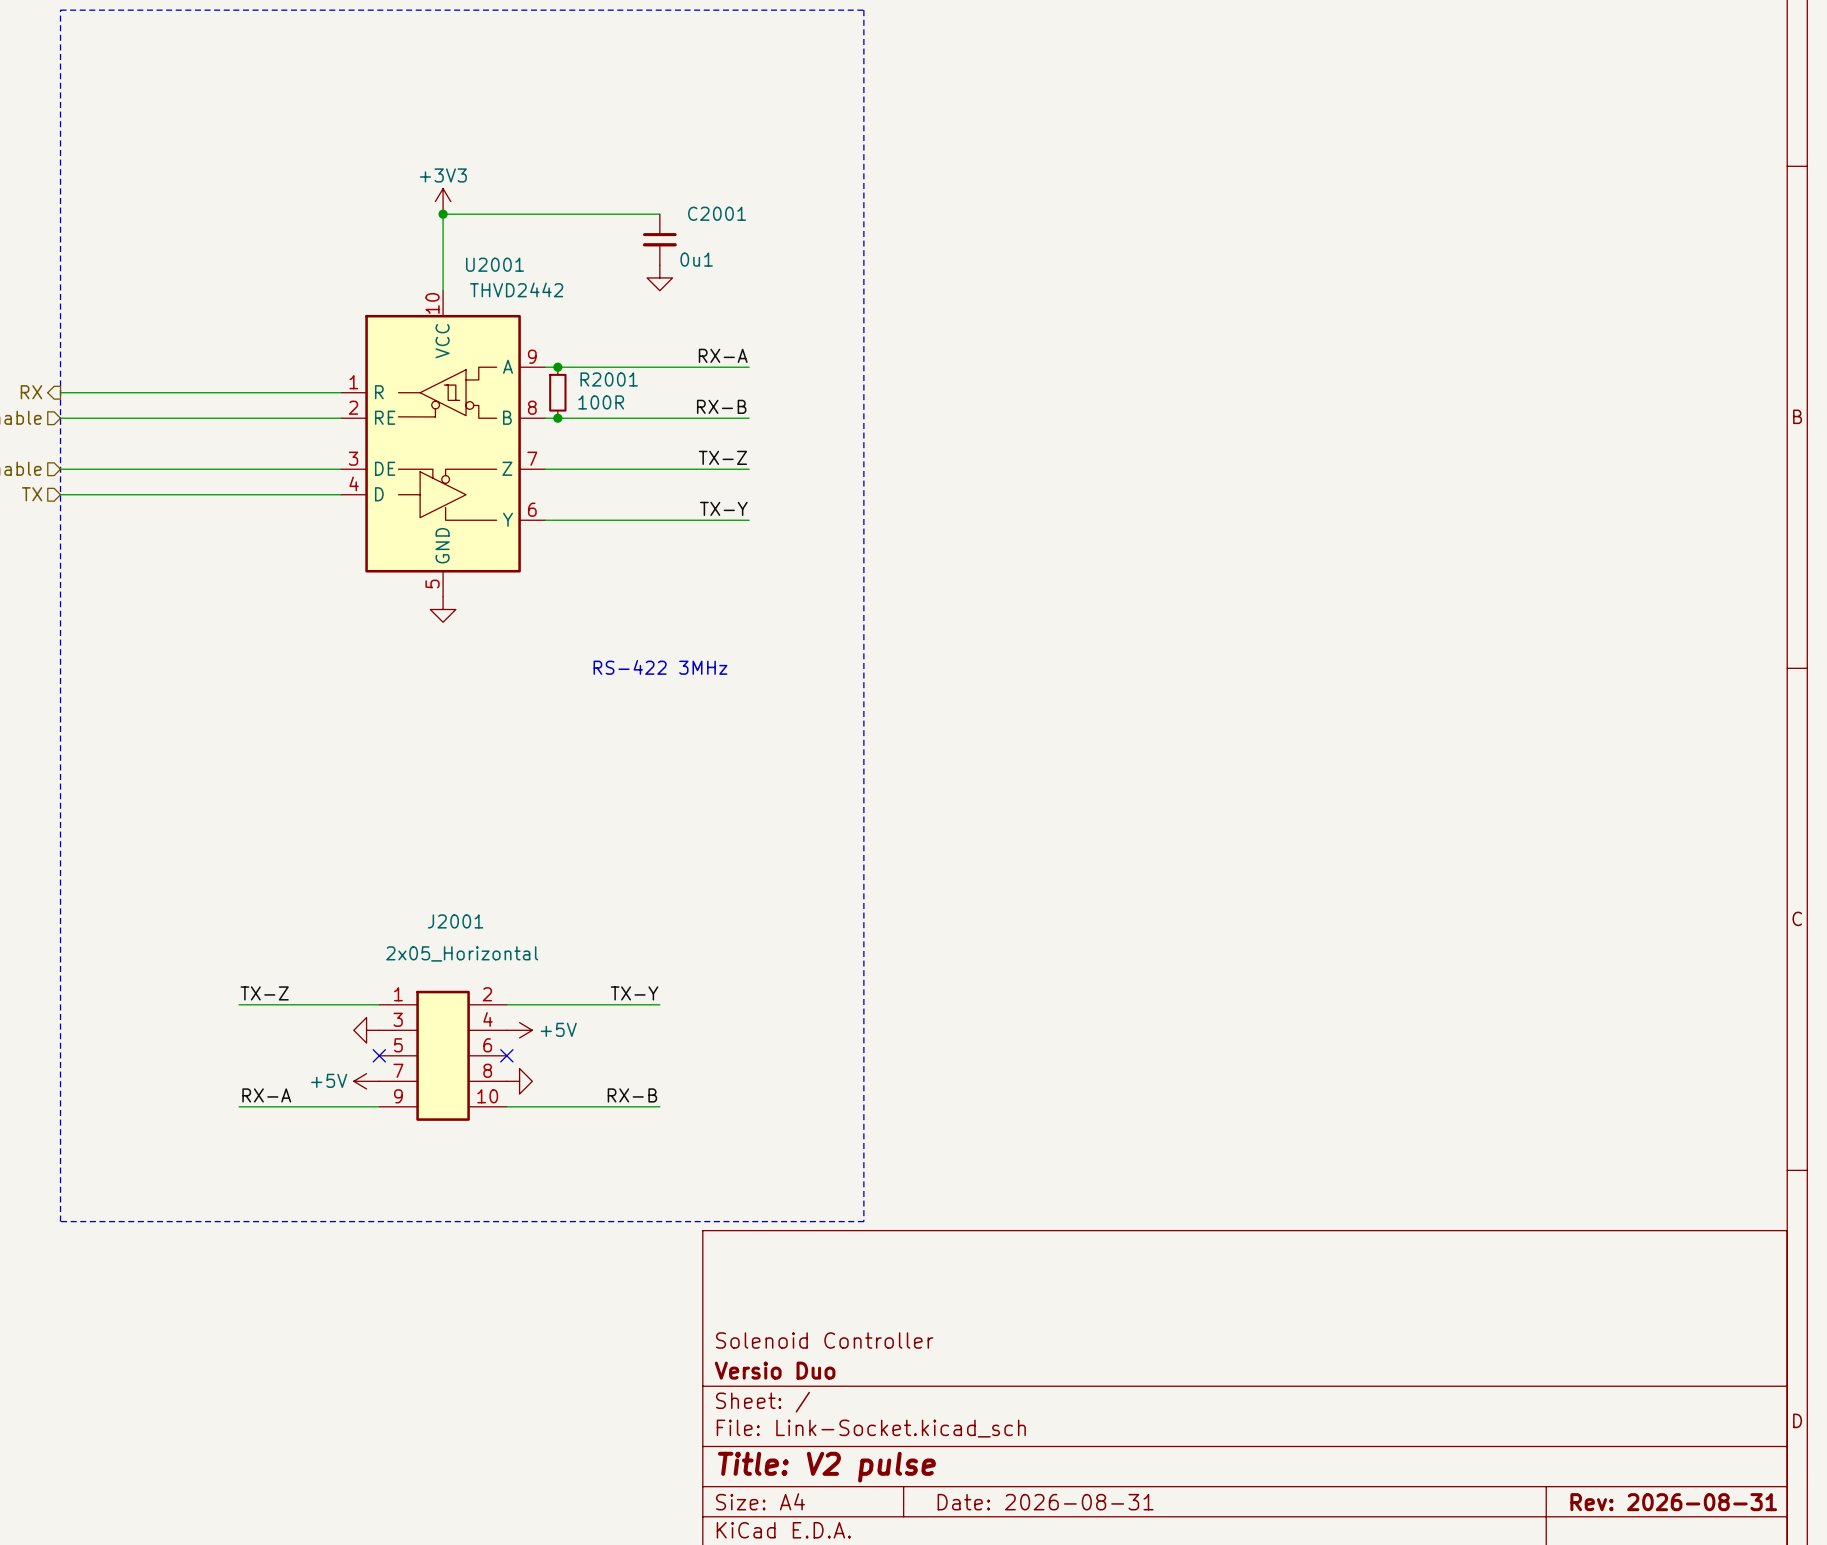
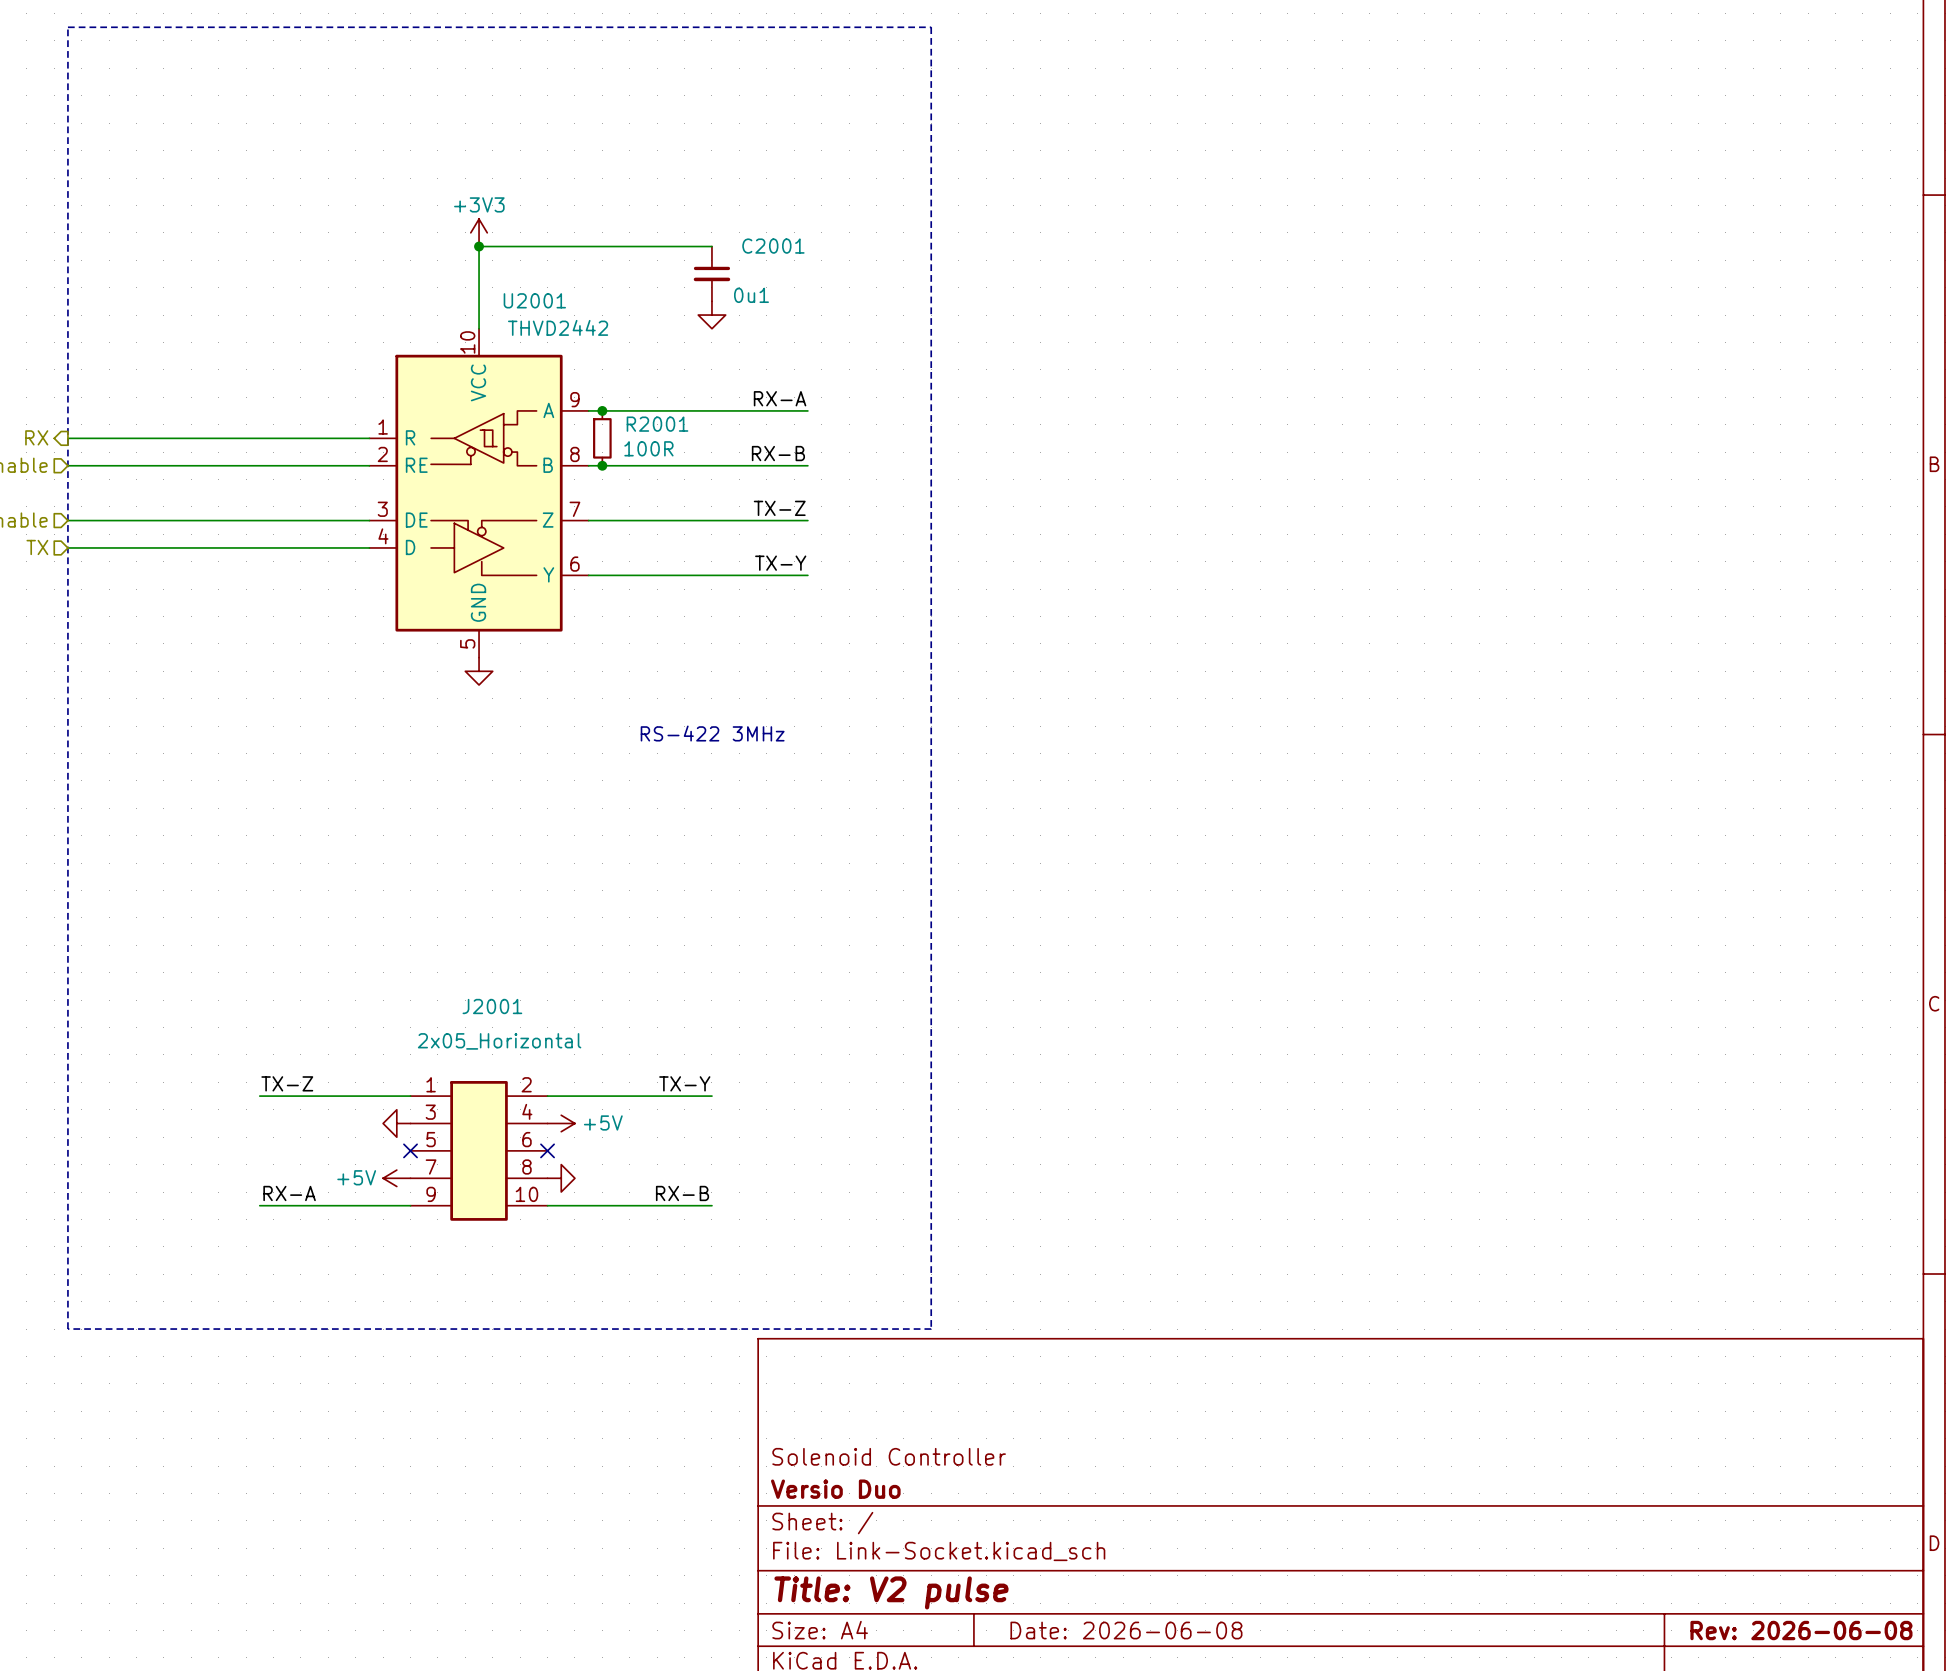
title block: Date: 2026-08-31 (1045, 1502) -> Date: 2026-06-08 (1126, 1630)
title block: Rev: 2026-08-31 (1673, 1502) -> Rev: 2026-06-08 (1801, 1630)

